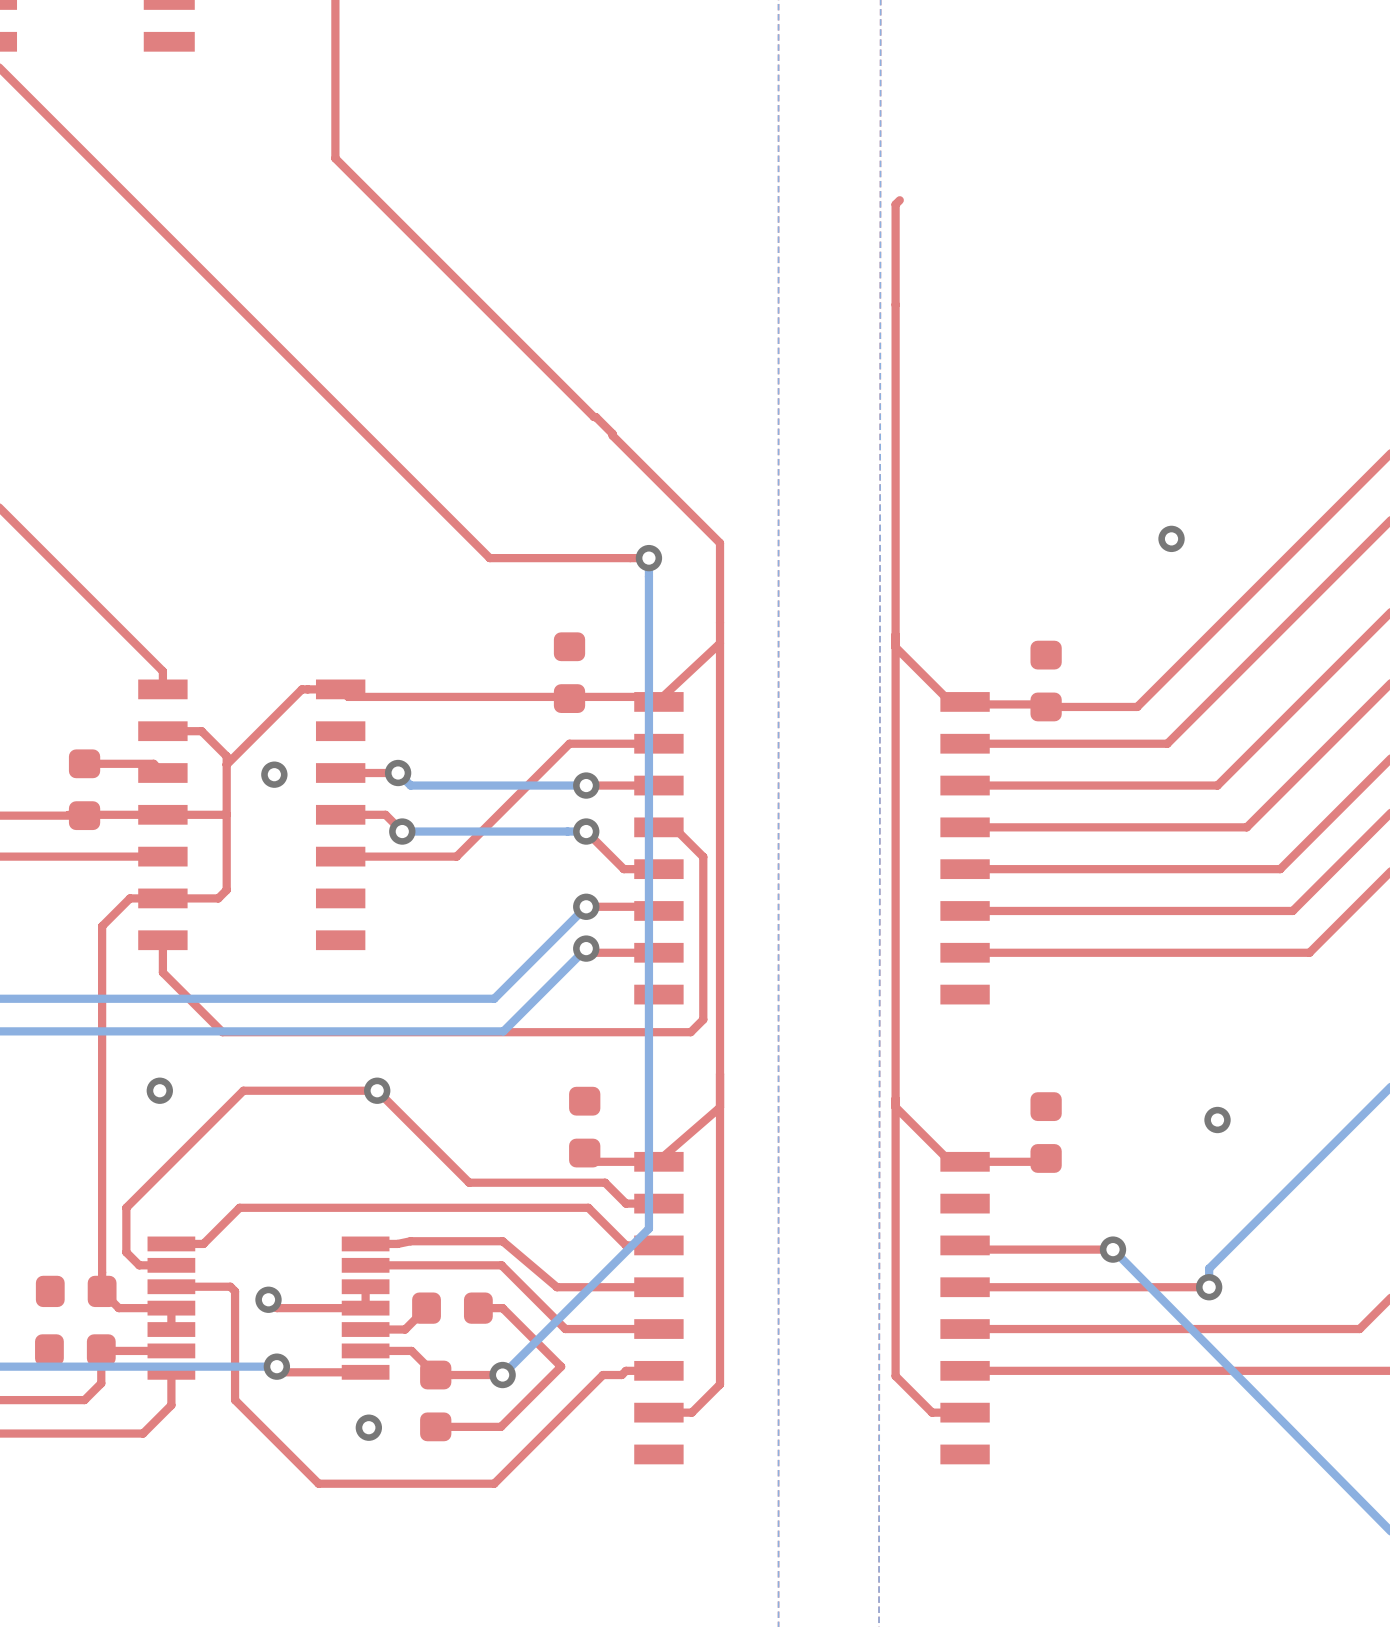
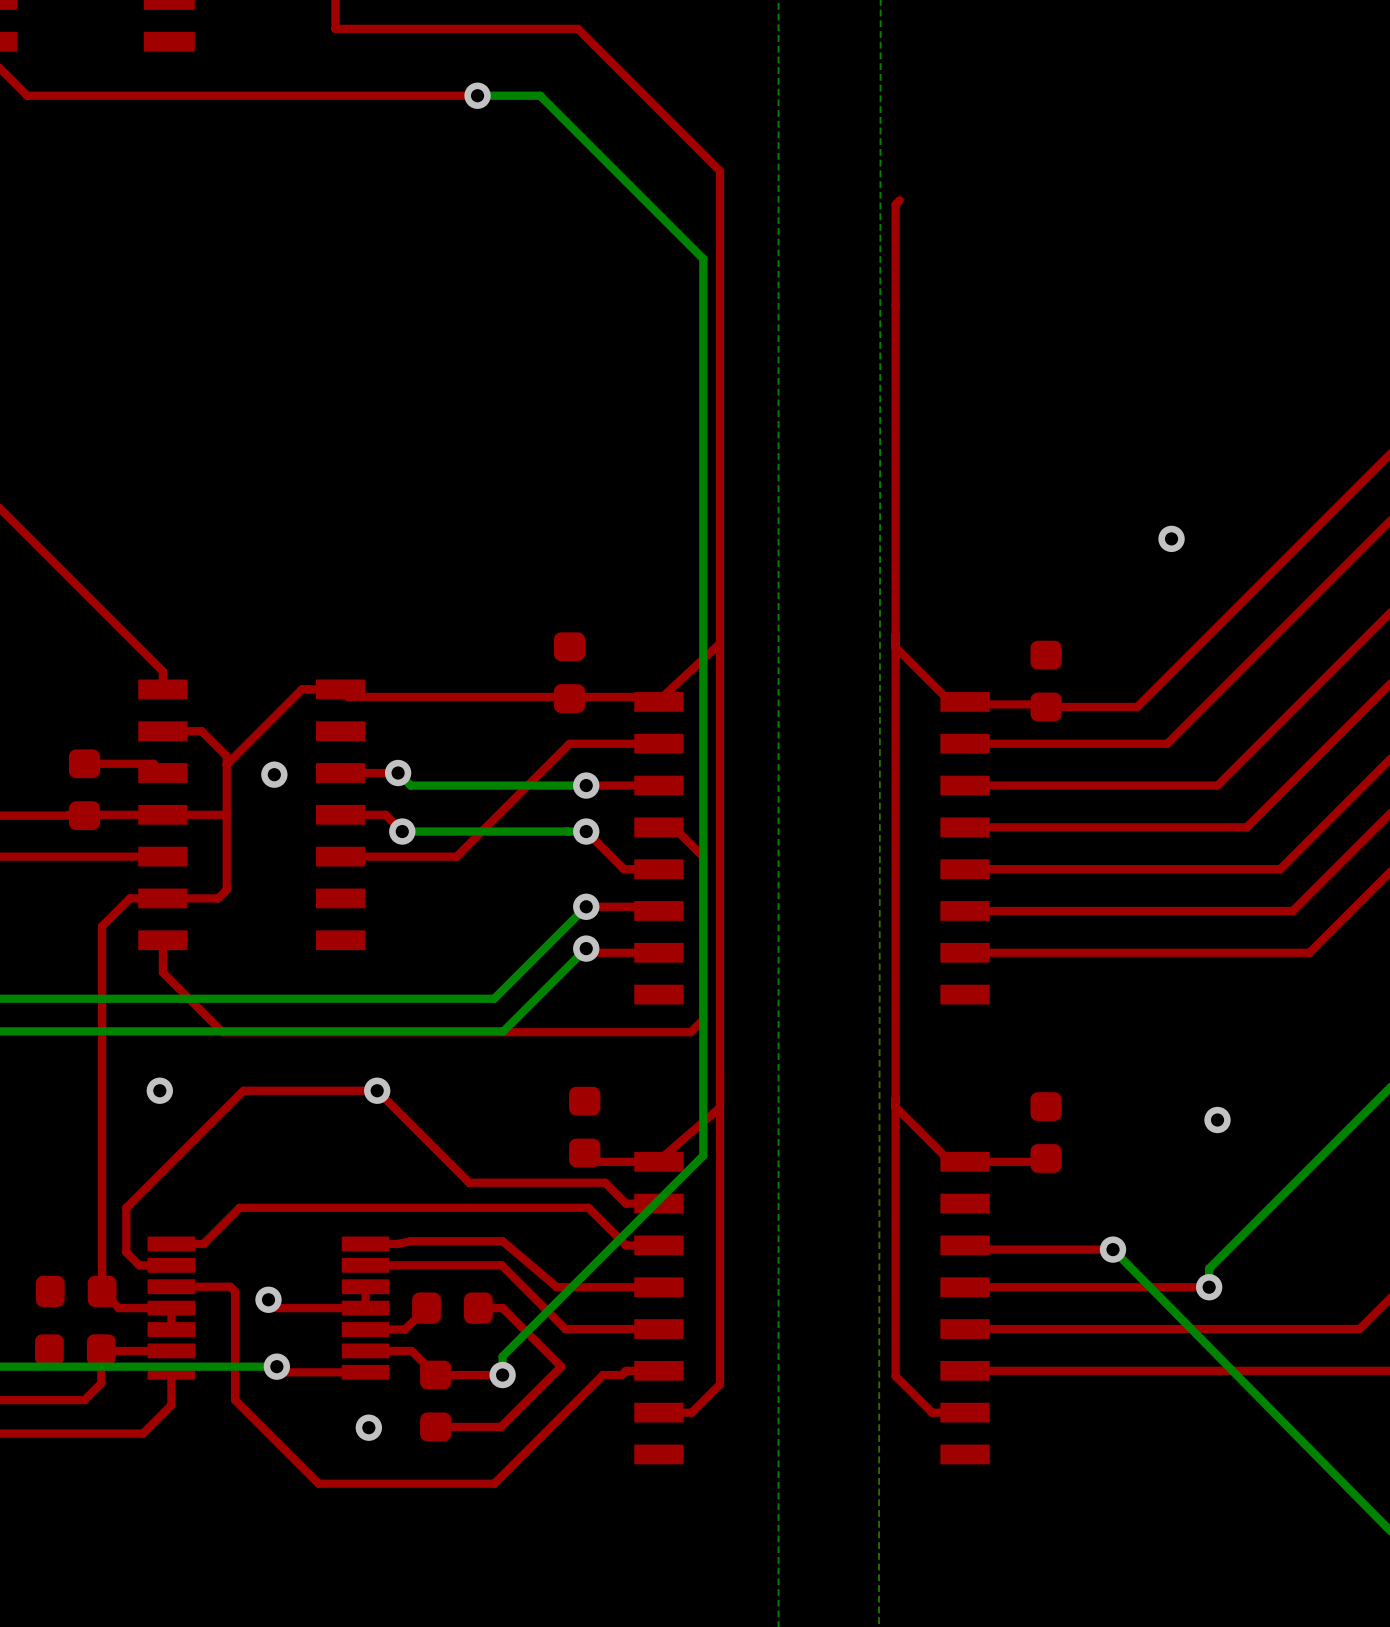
top track: (335, 28) (335, 158) (720, 543) -> (335, 28) (577, 28) (720, 170) (720, 543)
top track: (27, 95) (489, 558) (648, 558) -> (27, 95) (477, 95)
via: none -> (477, 95)
bottom track: (648, 558) (648, 1228) (502, 1375) -> (477, 95) (540, 95) (703, 258) (703, 1155) (502, 1356) (502, 1375)
via: (648, 558) -> none

